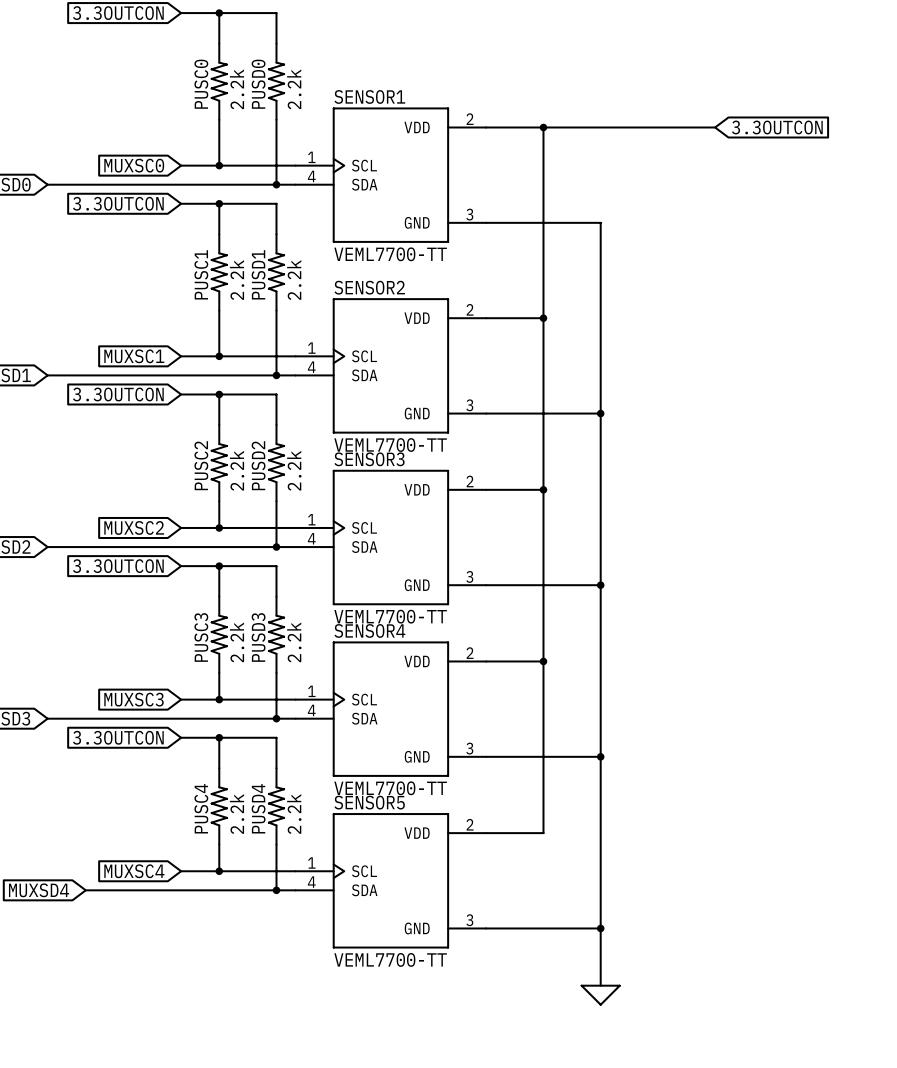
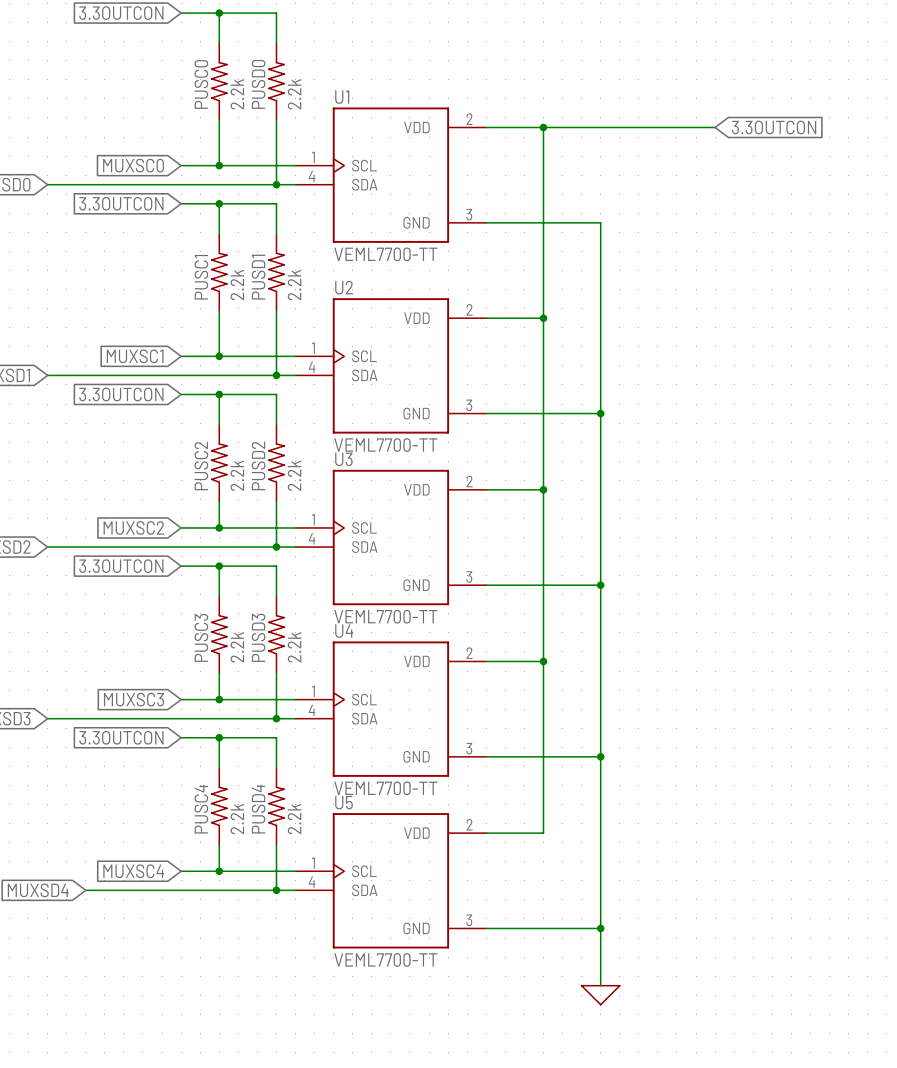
SENSOR1 name: SENSOR1 (369, 96) -> U1 (342, 97)
SENSOR2 name: SENSOR2 (369, 287) -> U2 (344, 287)
SENSOR3 name: SENSOR3 (369, 459) -> U3 (343, 459)
SENSOR4 name: SENSOR4 (369, 630) -> U4 (344, 631)
SENSOR5 name: SENSOR5 (369, 802) -> U5 (343, 802)

